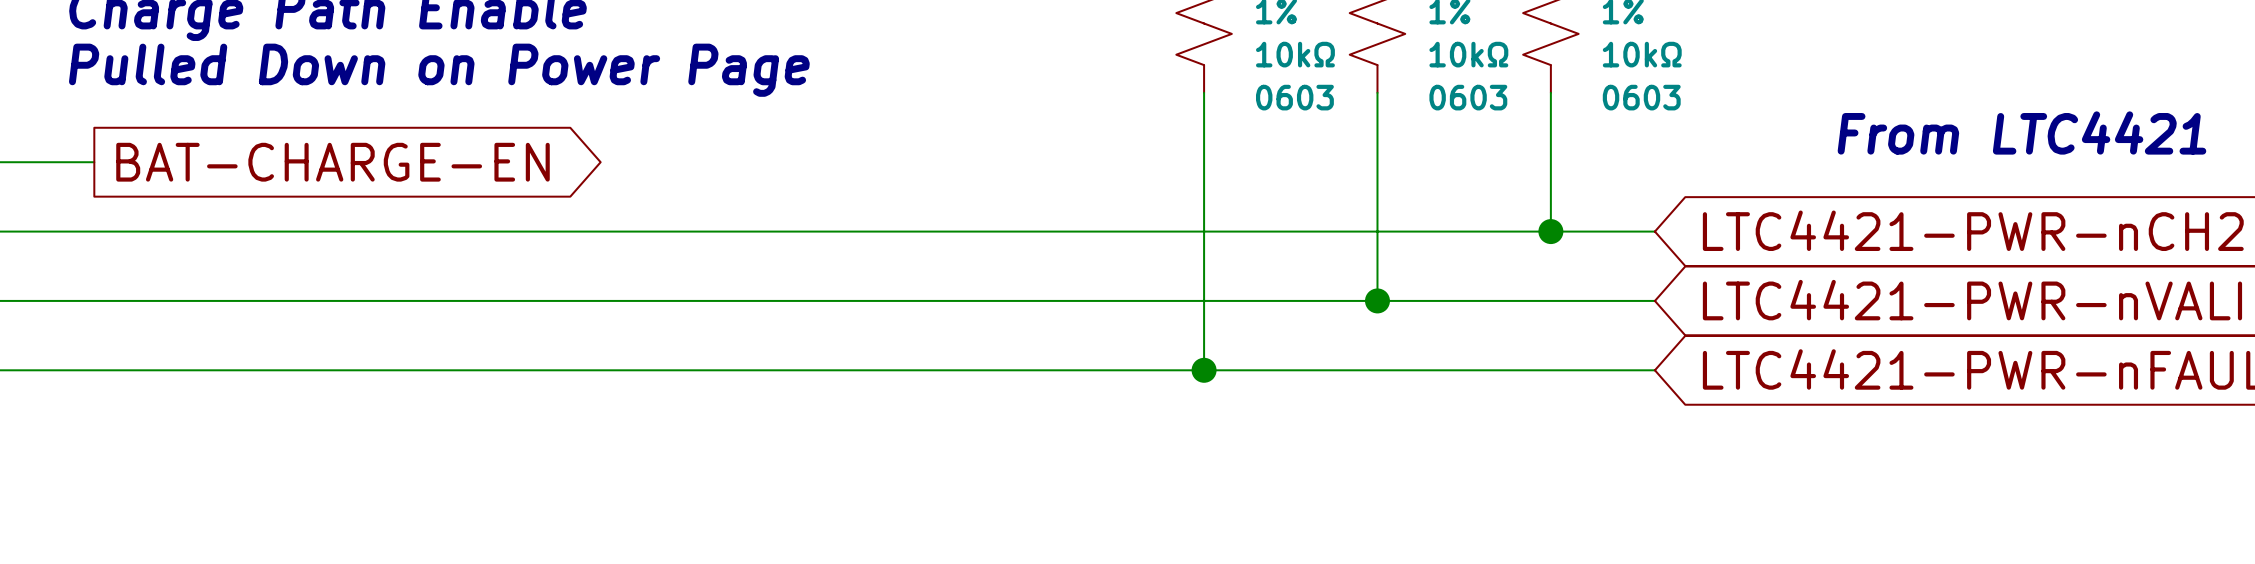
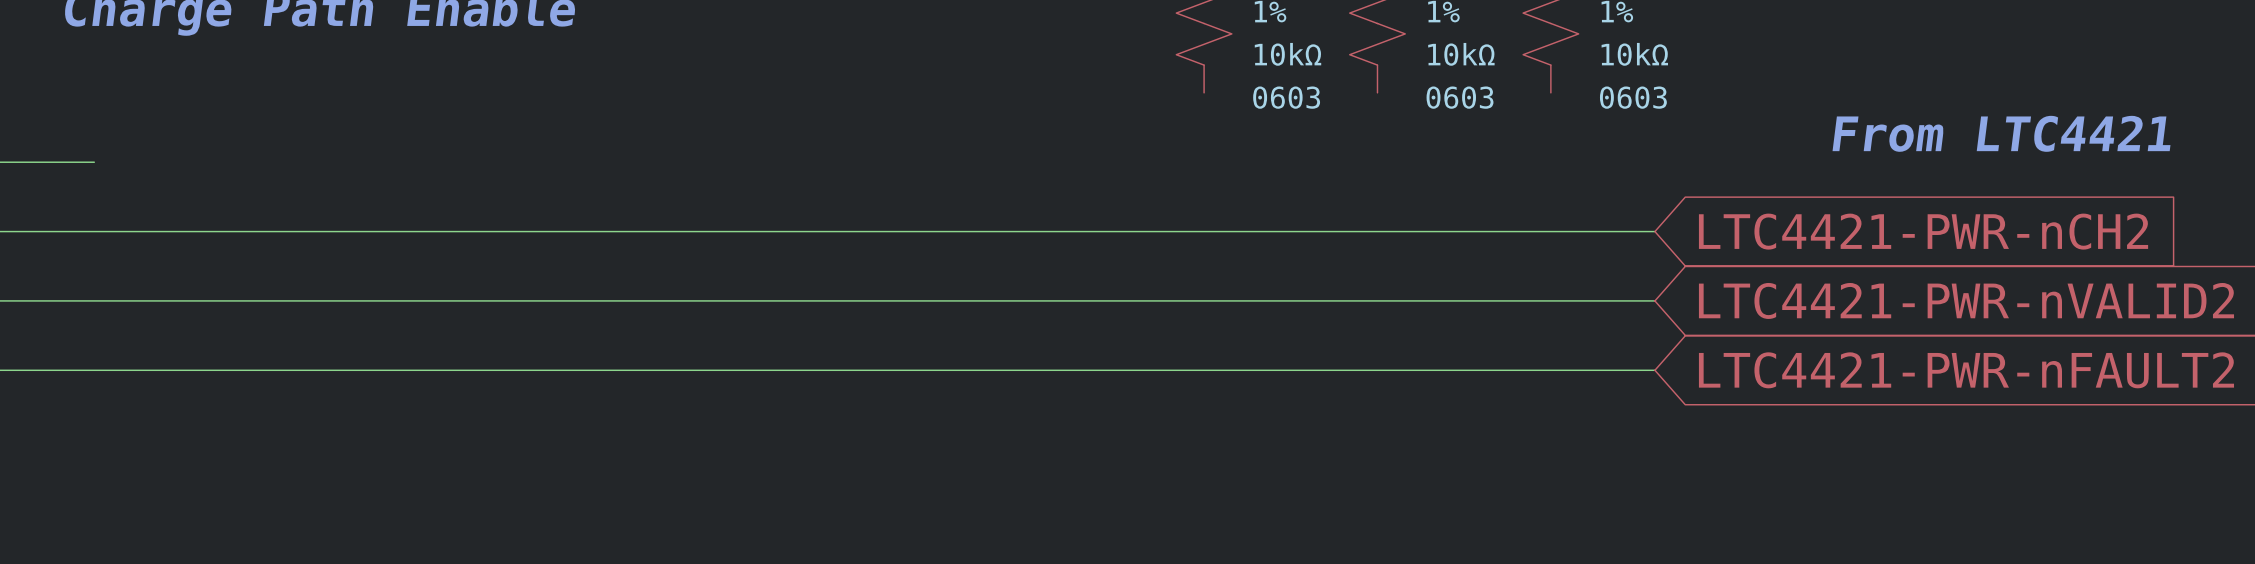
text: Pulled Down on Power Page (439, 70) -> none
wire: (1204, 92) (1204, 370) -> none
wire: (1377, 92) (1377, 300) -> none
wire: (1550, 92) (1550, 231) -> none
global label: BAT-CHARGE-EN (333, 162) -> none
junction: (1550, 231) -> none
junction: (1377, 300) -> none
junction: (1204, 370) -> none

